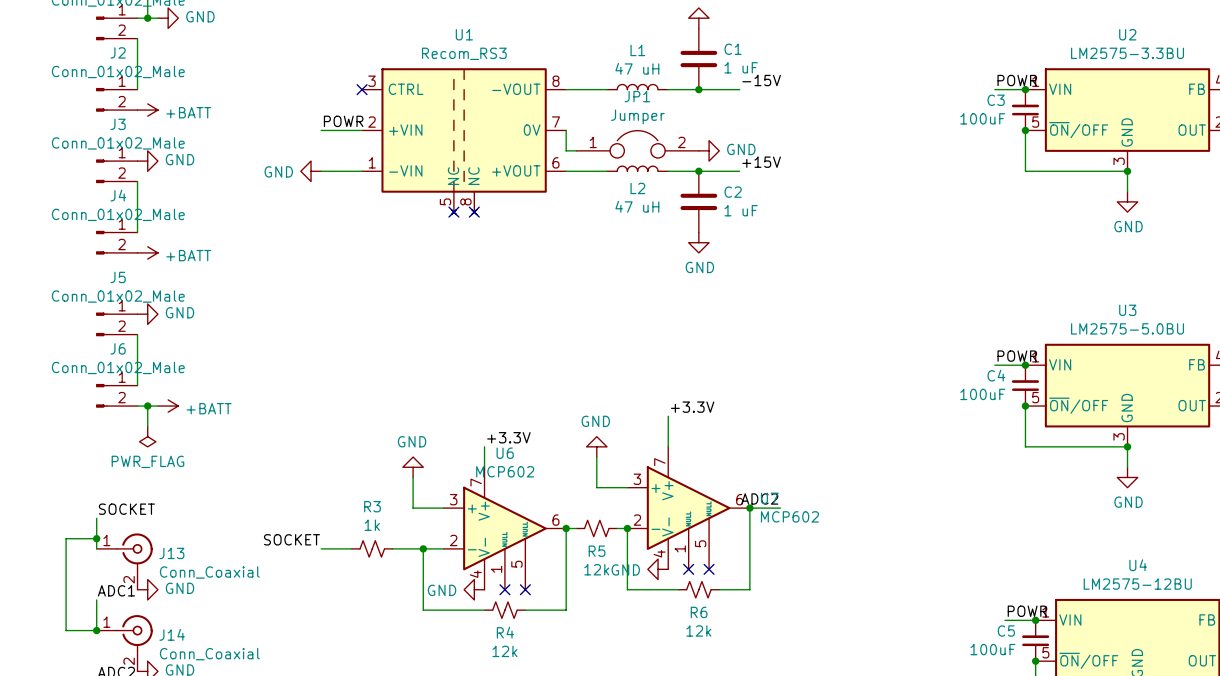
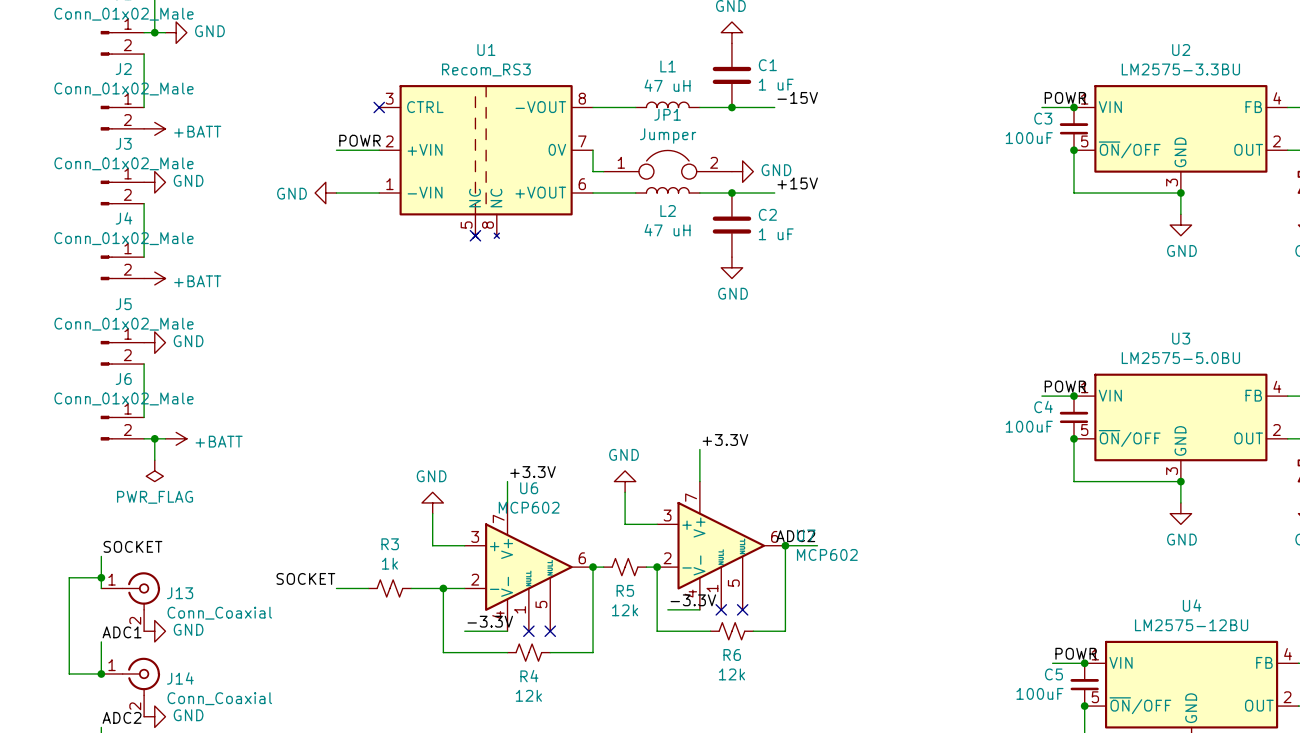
no-connect mark: (474, 212) -> none
label: none -> -3.3V (693, 600)
wire: none -> (667, 609) (699, 609)
power symbol: GND (658, 569) -> none
label: none -> -3.3V (490, 621)
wire: none -> (464, 631) (507, 631)
power symbol: GND (474, 589) -> none

